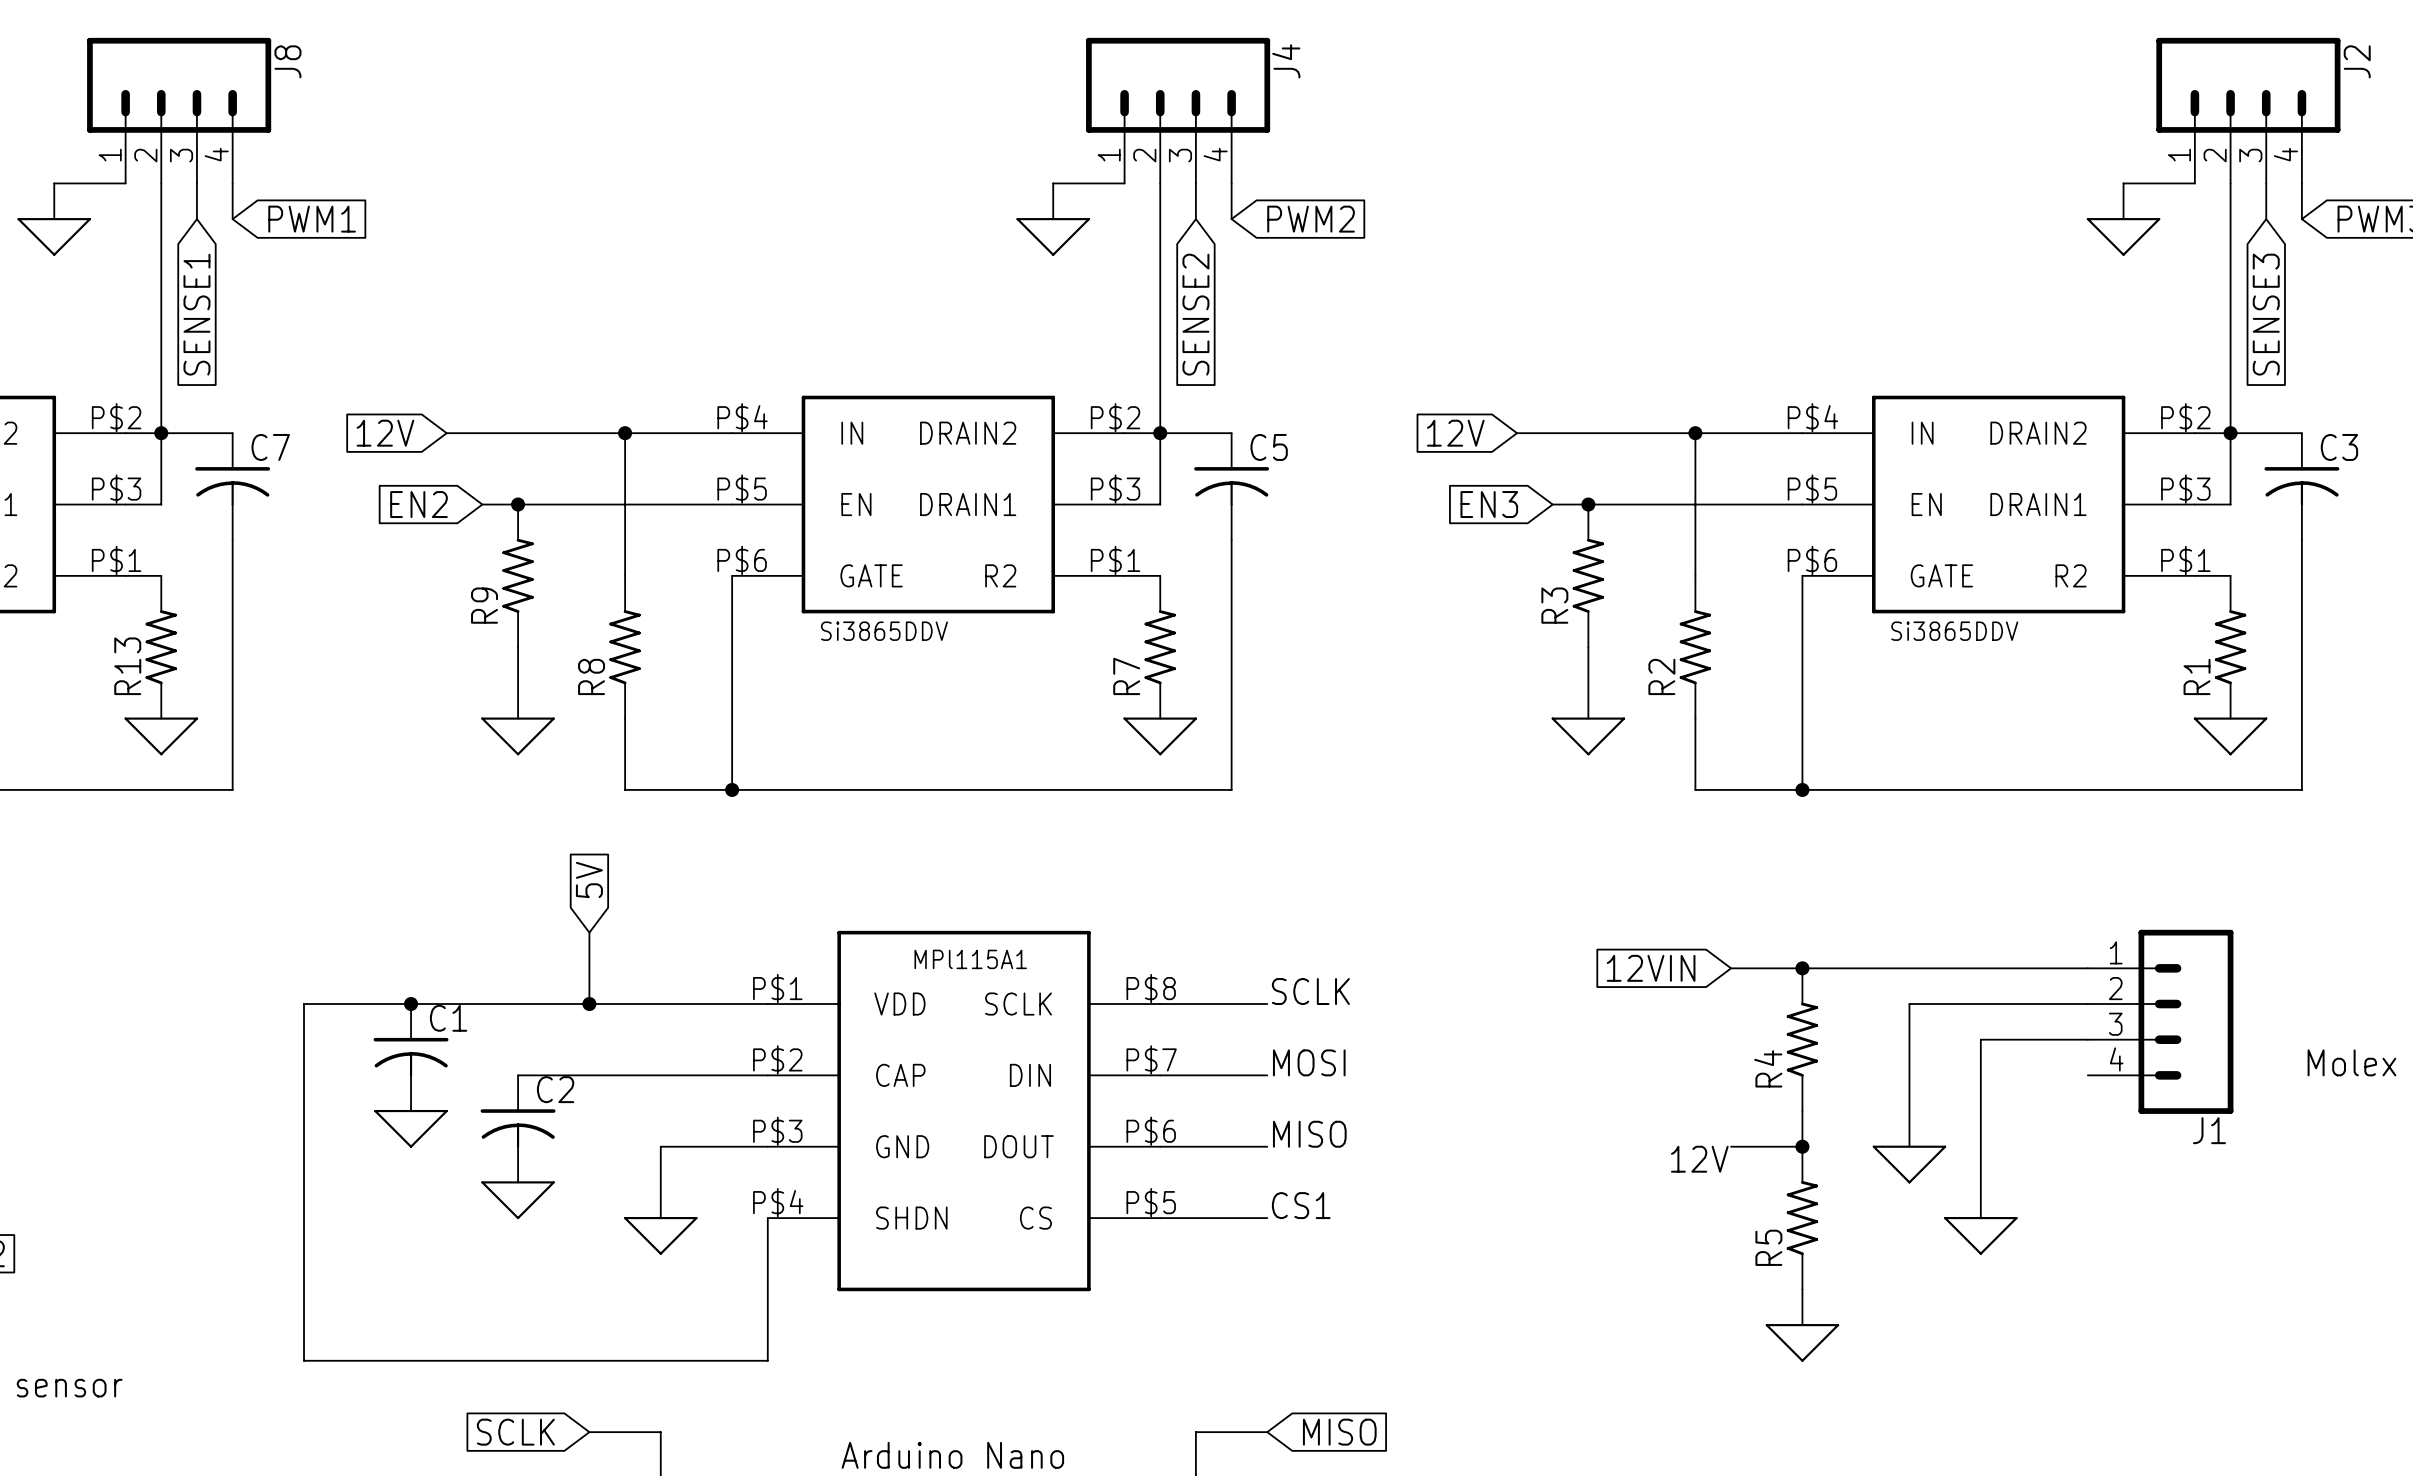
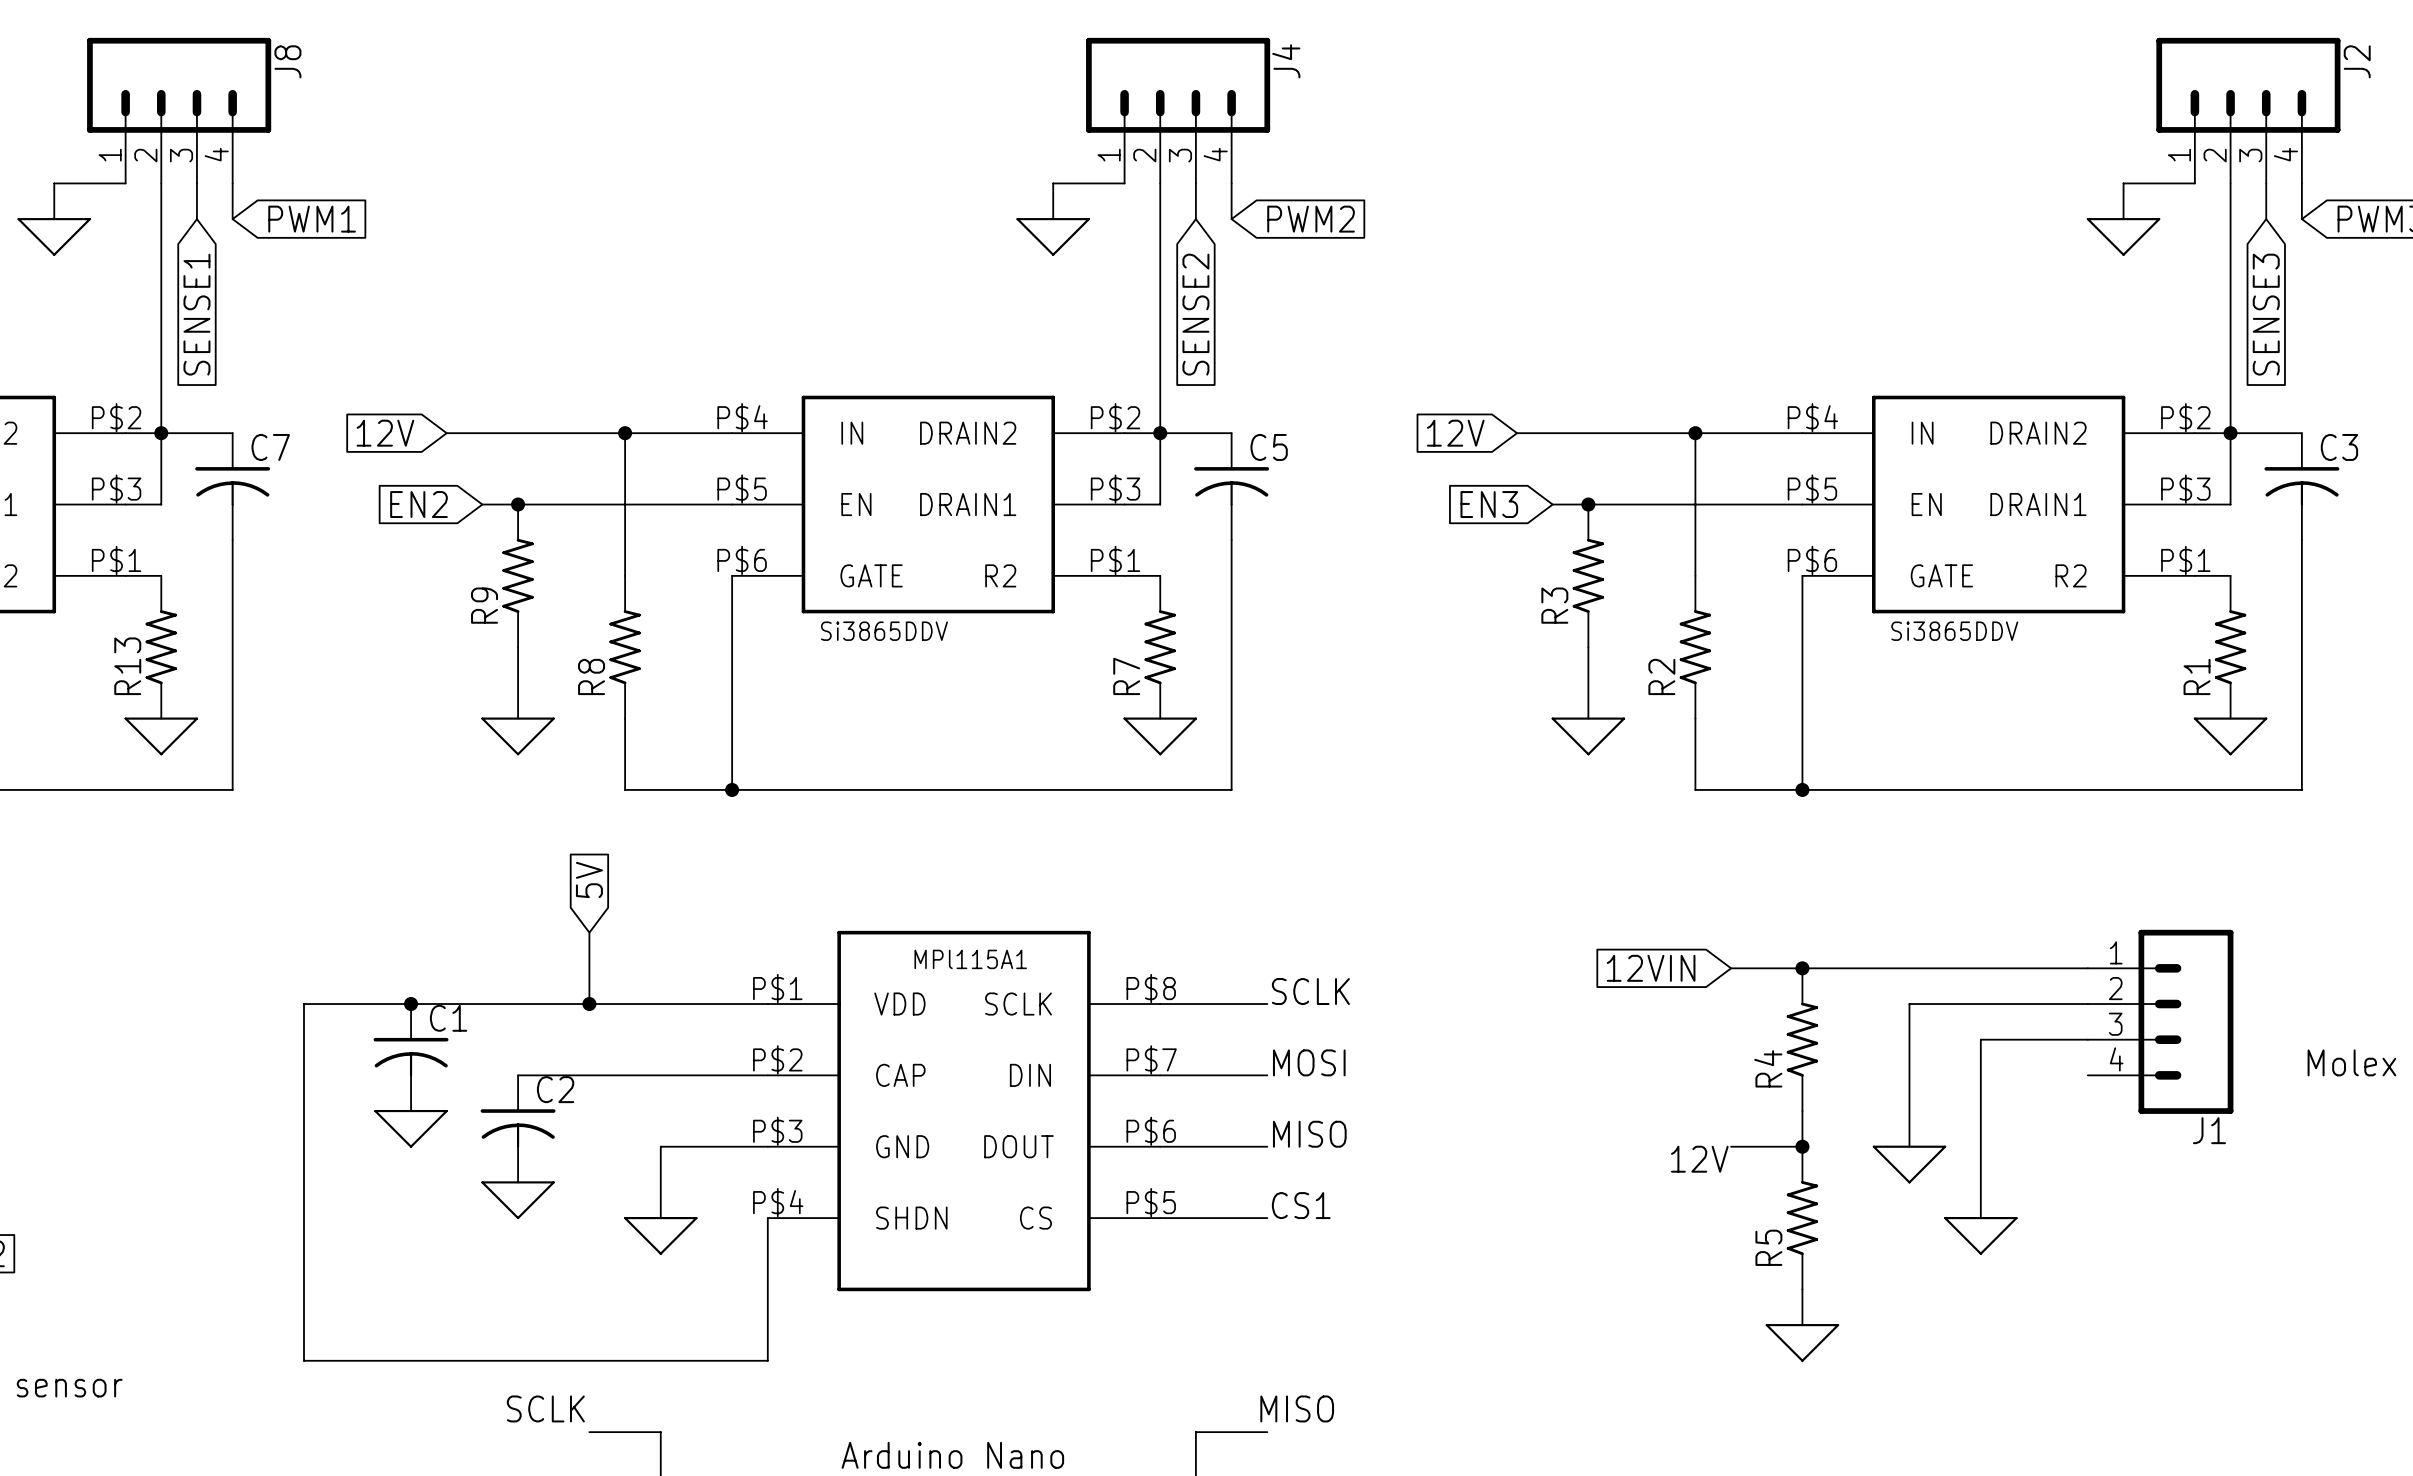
label: none -> SCLK (545, 1408)
label: none -> MISO (1297, 1408)
global label: SCLK (515, 1432) -> none
global label: MISO (1339, 1432) -> none

